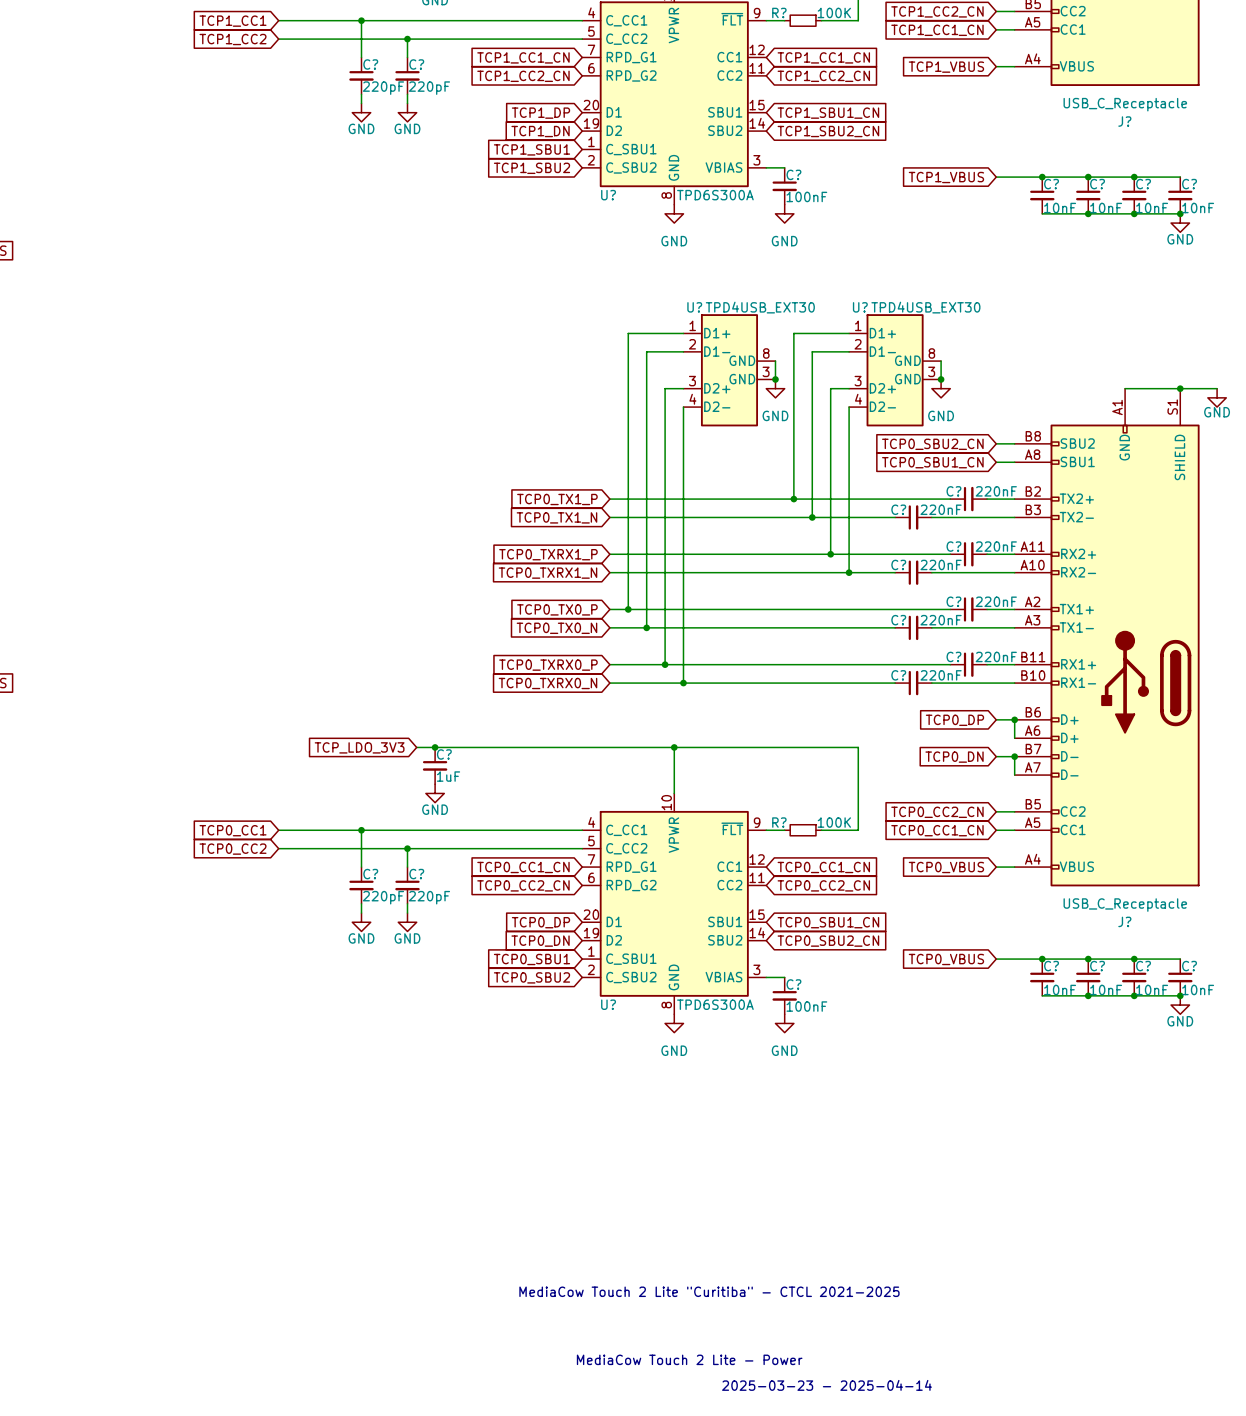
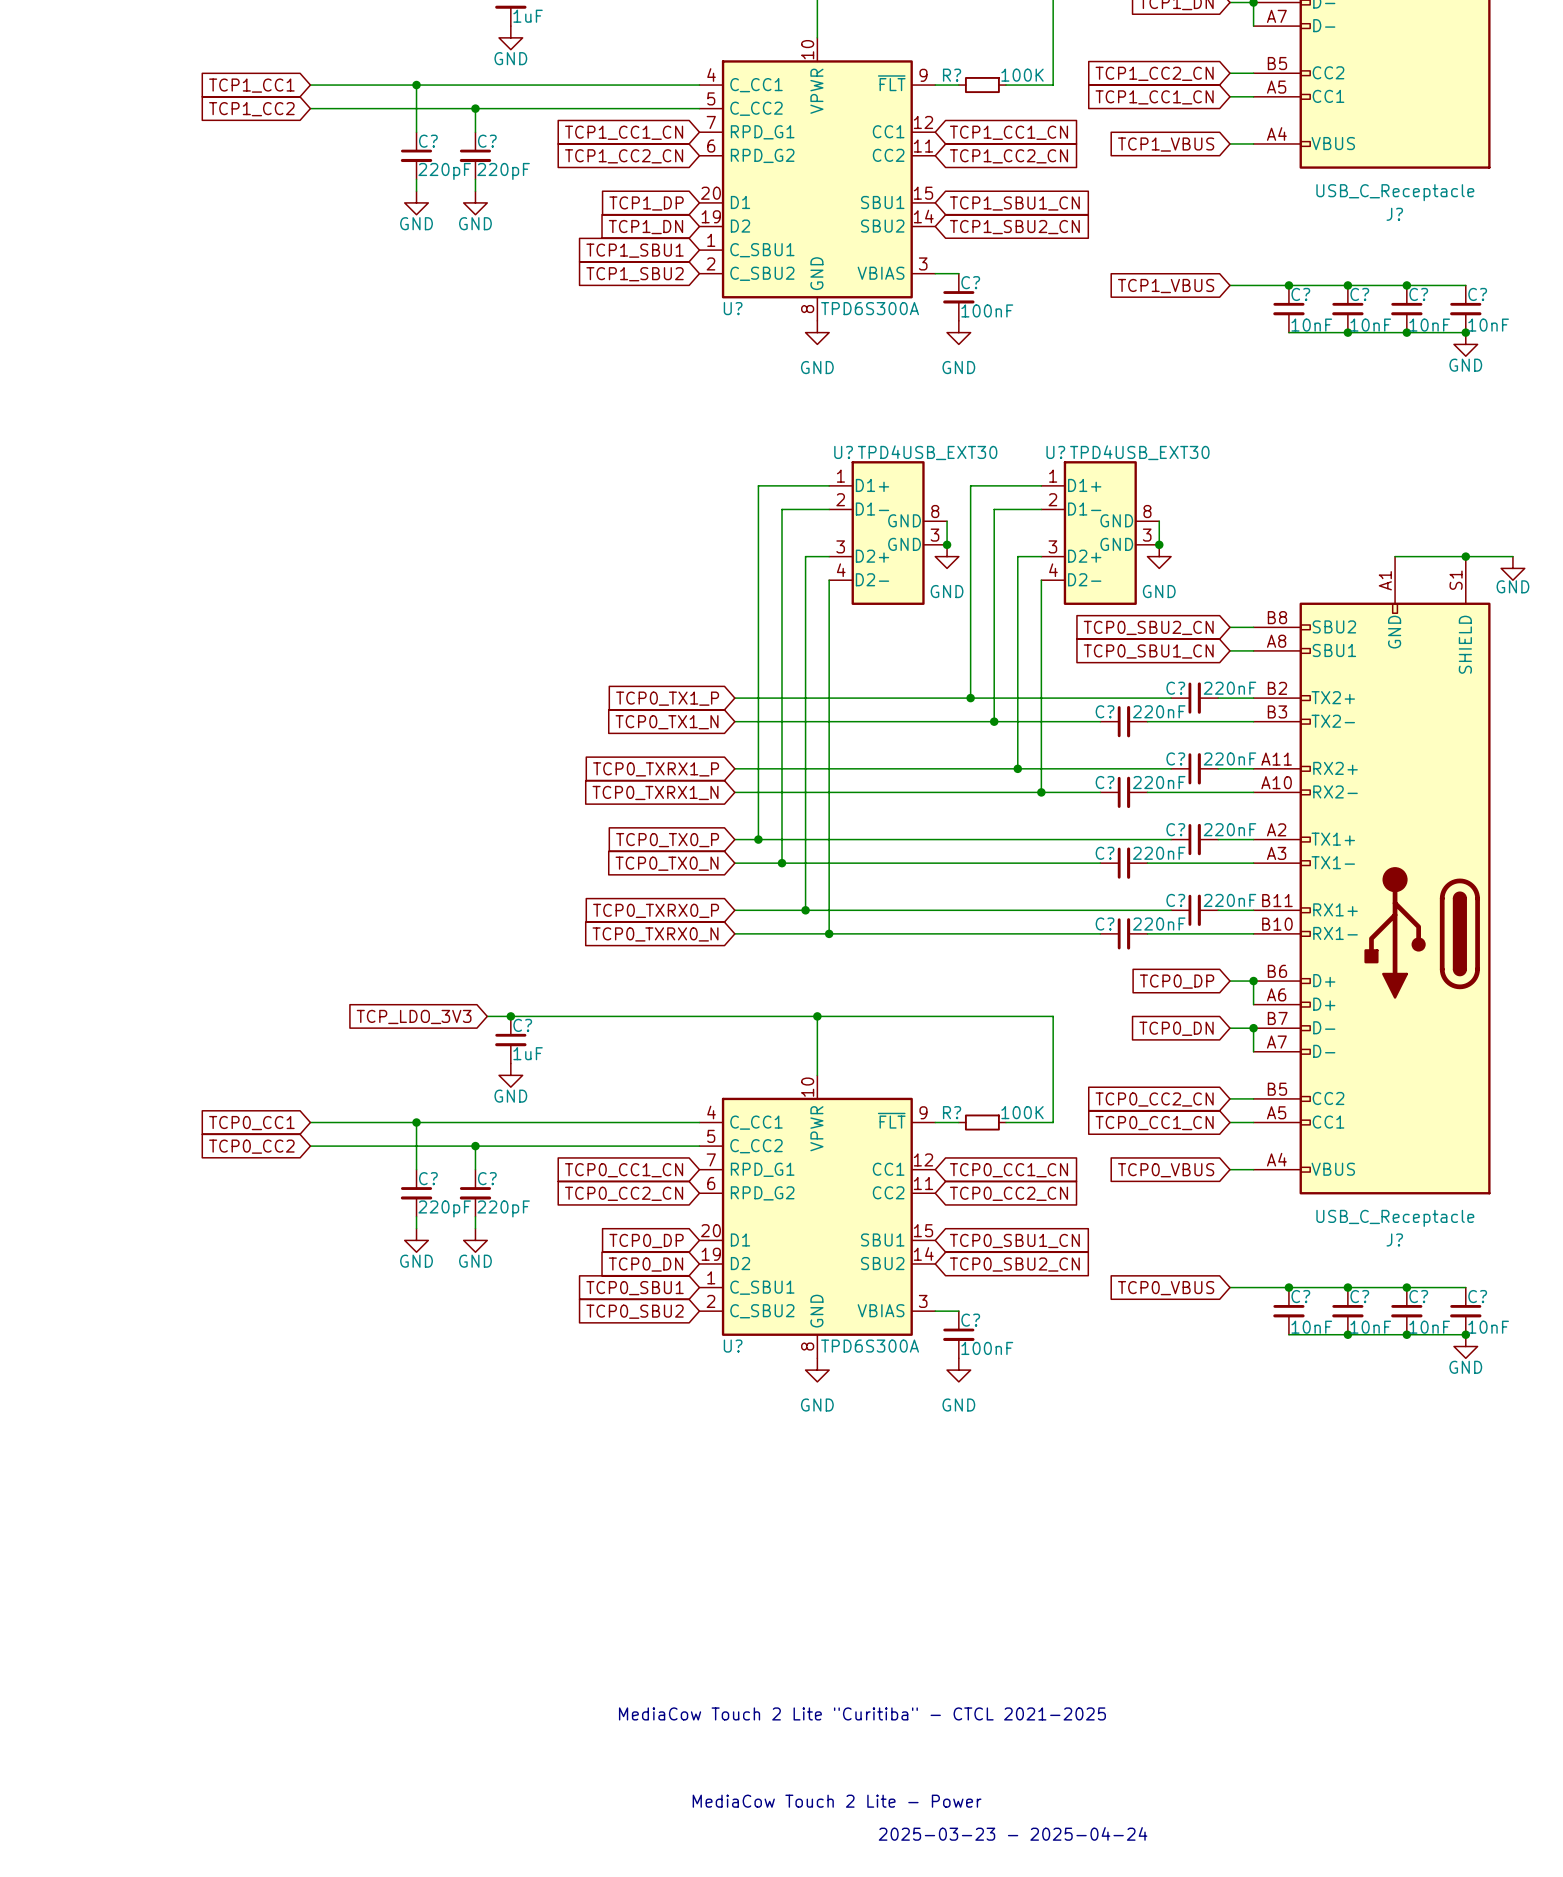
text: 2025-03-23 - 2025-04-14 (827, 1385) -> 2025-03-23 - 2025-04-24 (1013, 1833)

